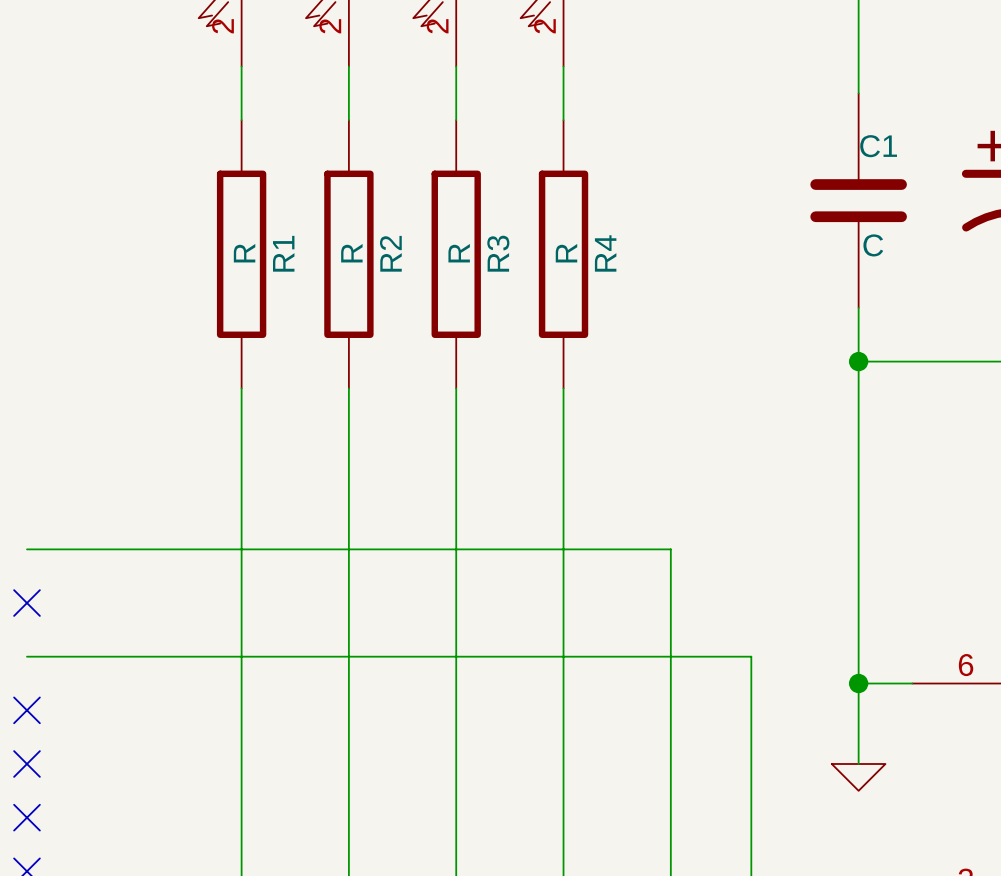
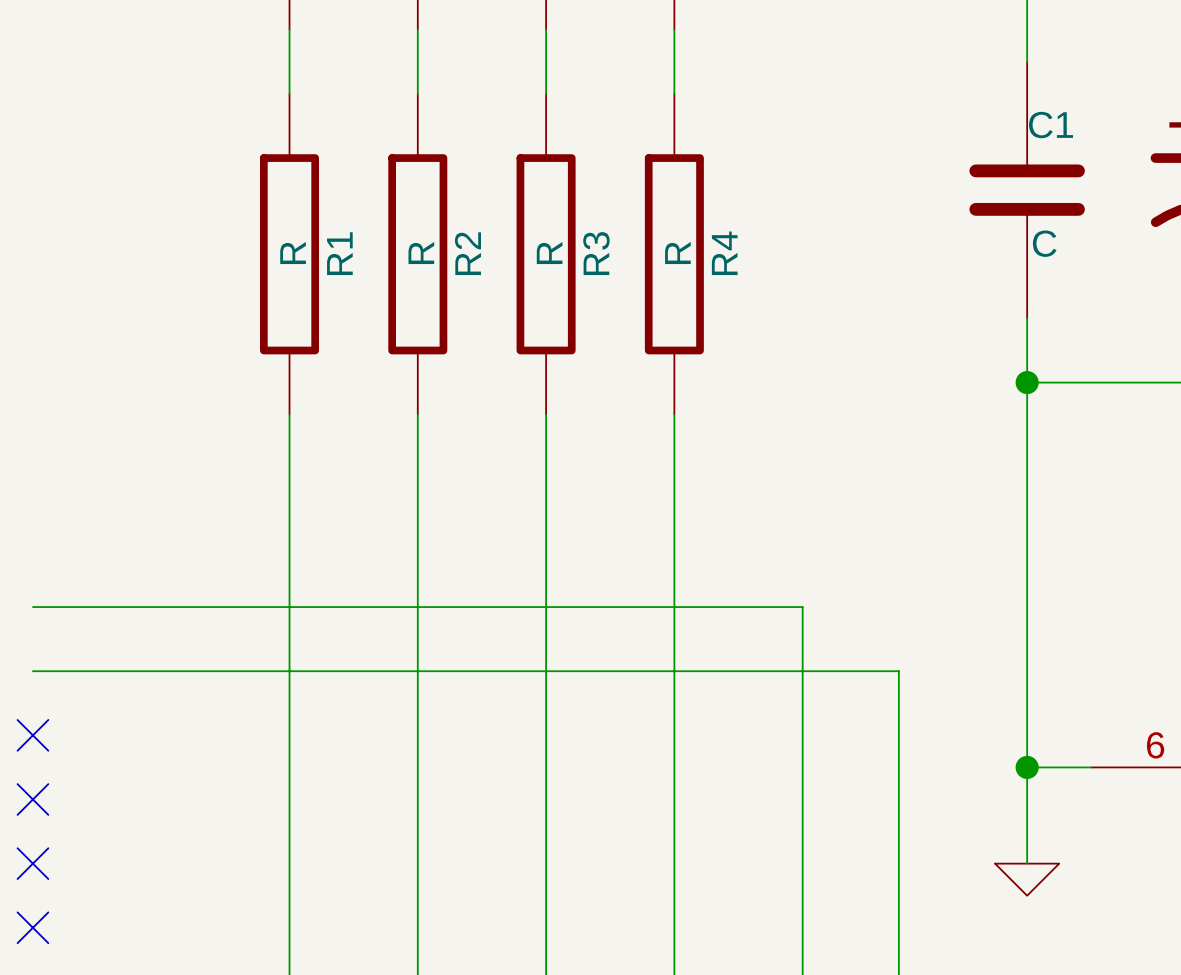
no-connect mark position: (26, 603) -> (32, 735)
wire: (26, 656) (751, 656) -> (32, 671) (898, 671) (898, 735)

